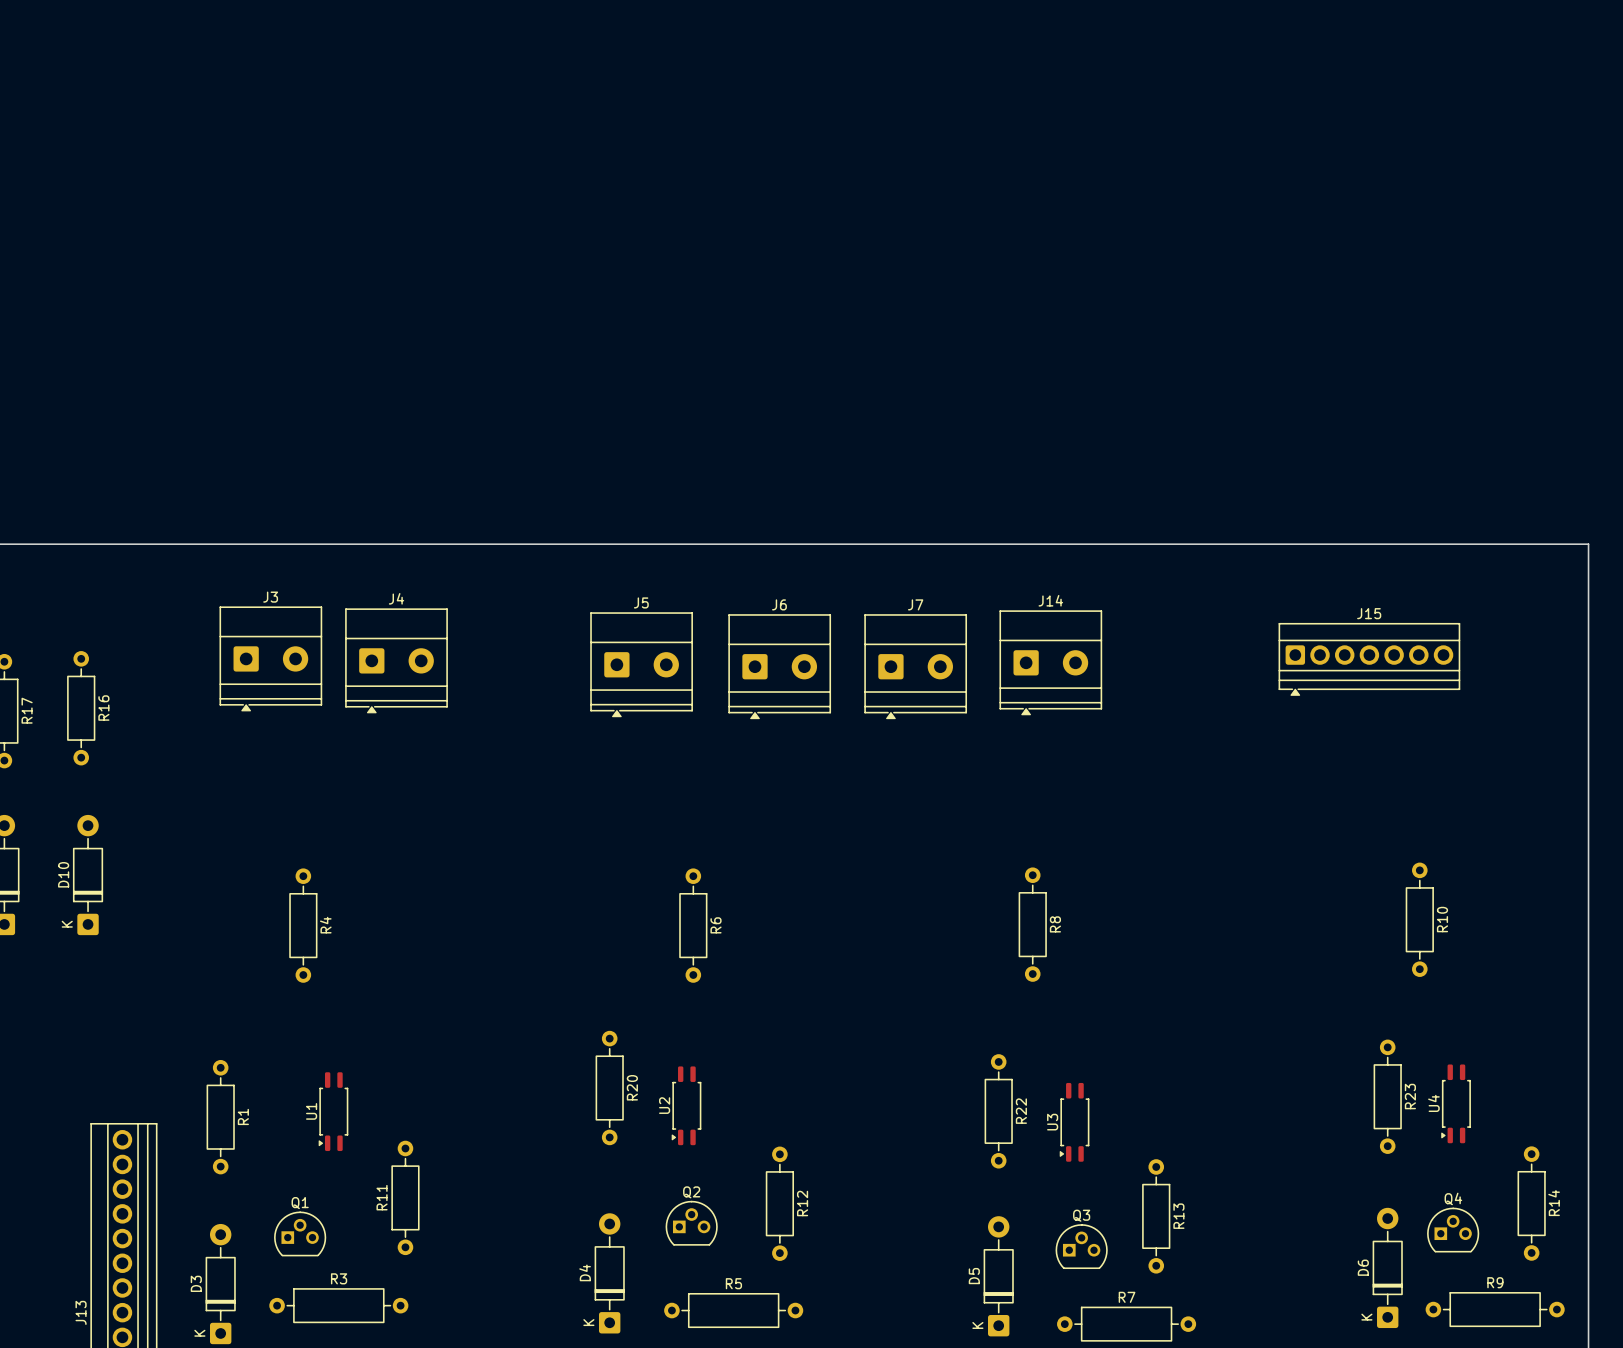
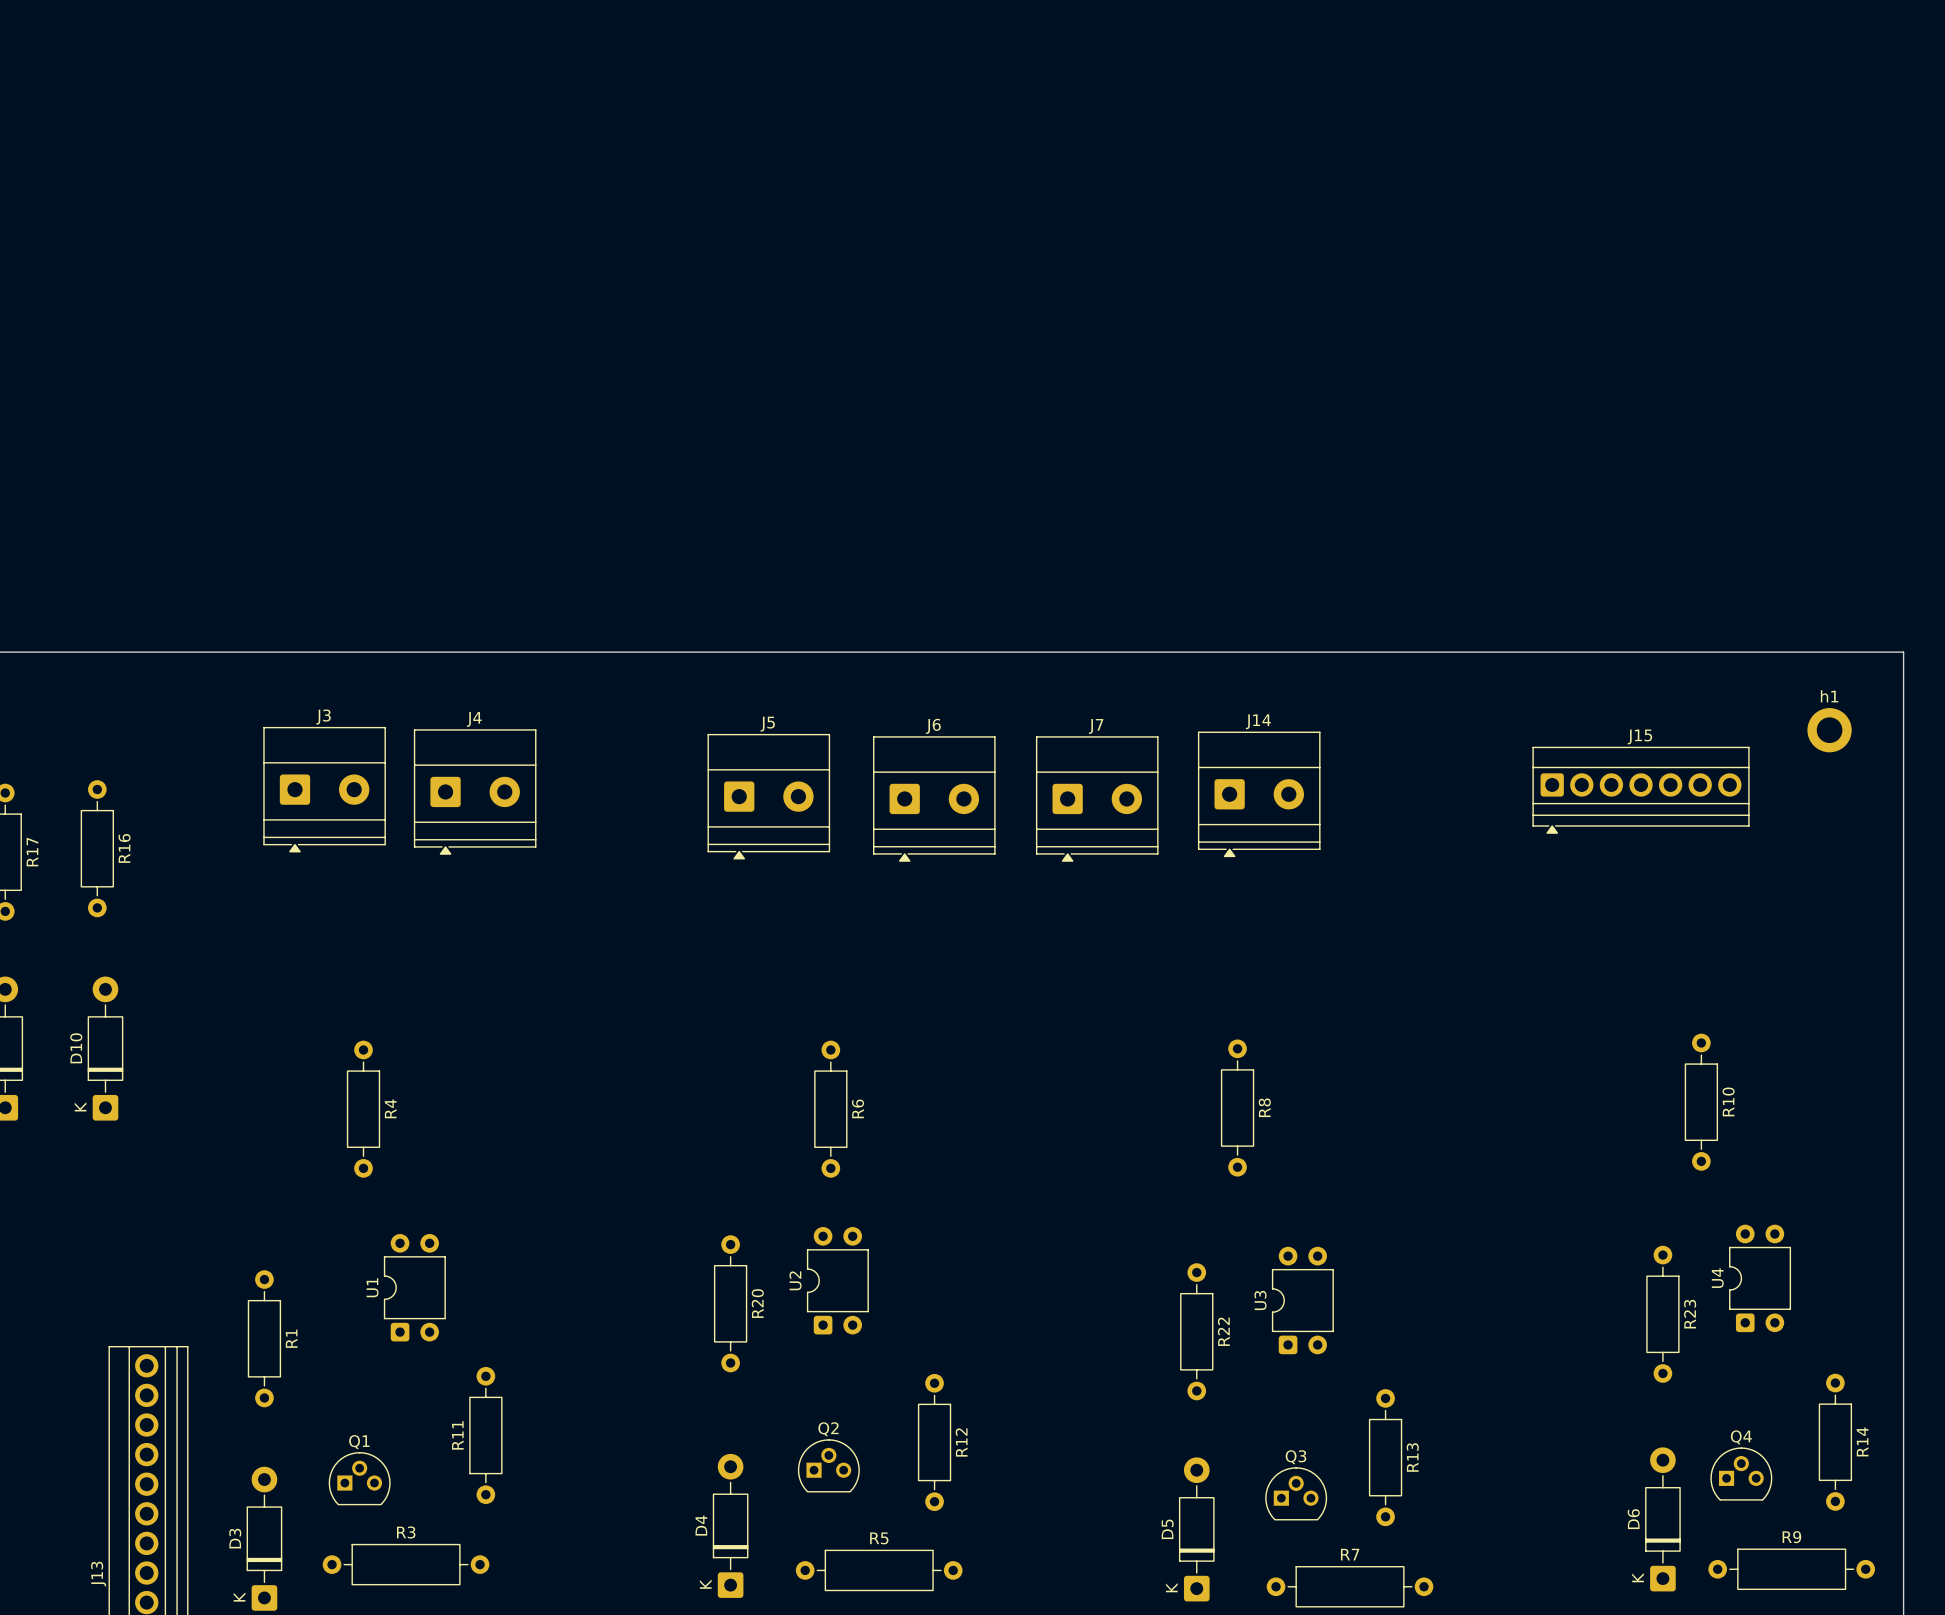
h1: none -> (1829, 730)
U4 footprint: [1441, 1064, 1471, 1144] -> [1729, 1224, 1792, 1333]
U2 footprint: [671, 1066, 702, 1146] -> [806, 1227, 869, 1335]
U1 footprint: [318, 1072, 349, 1152] -> [383, 1233, 446, 1342]
U3 footprint: [1059, 1082, 1090, 1162] -> [1271, 1246, 1334, 1355]

